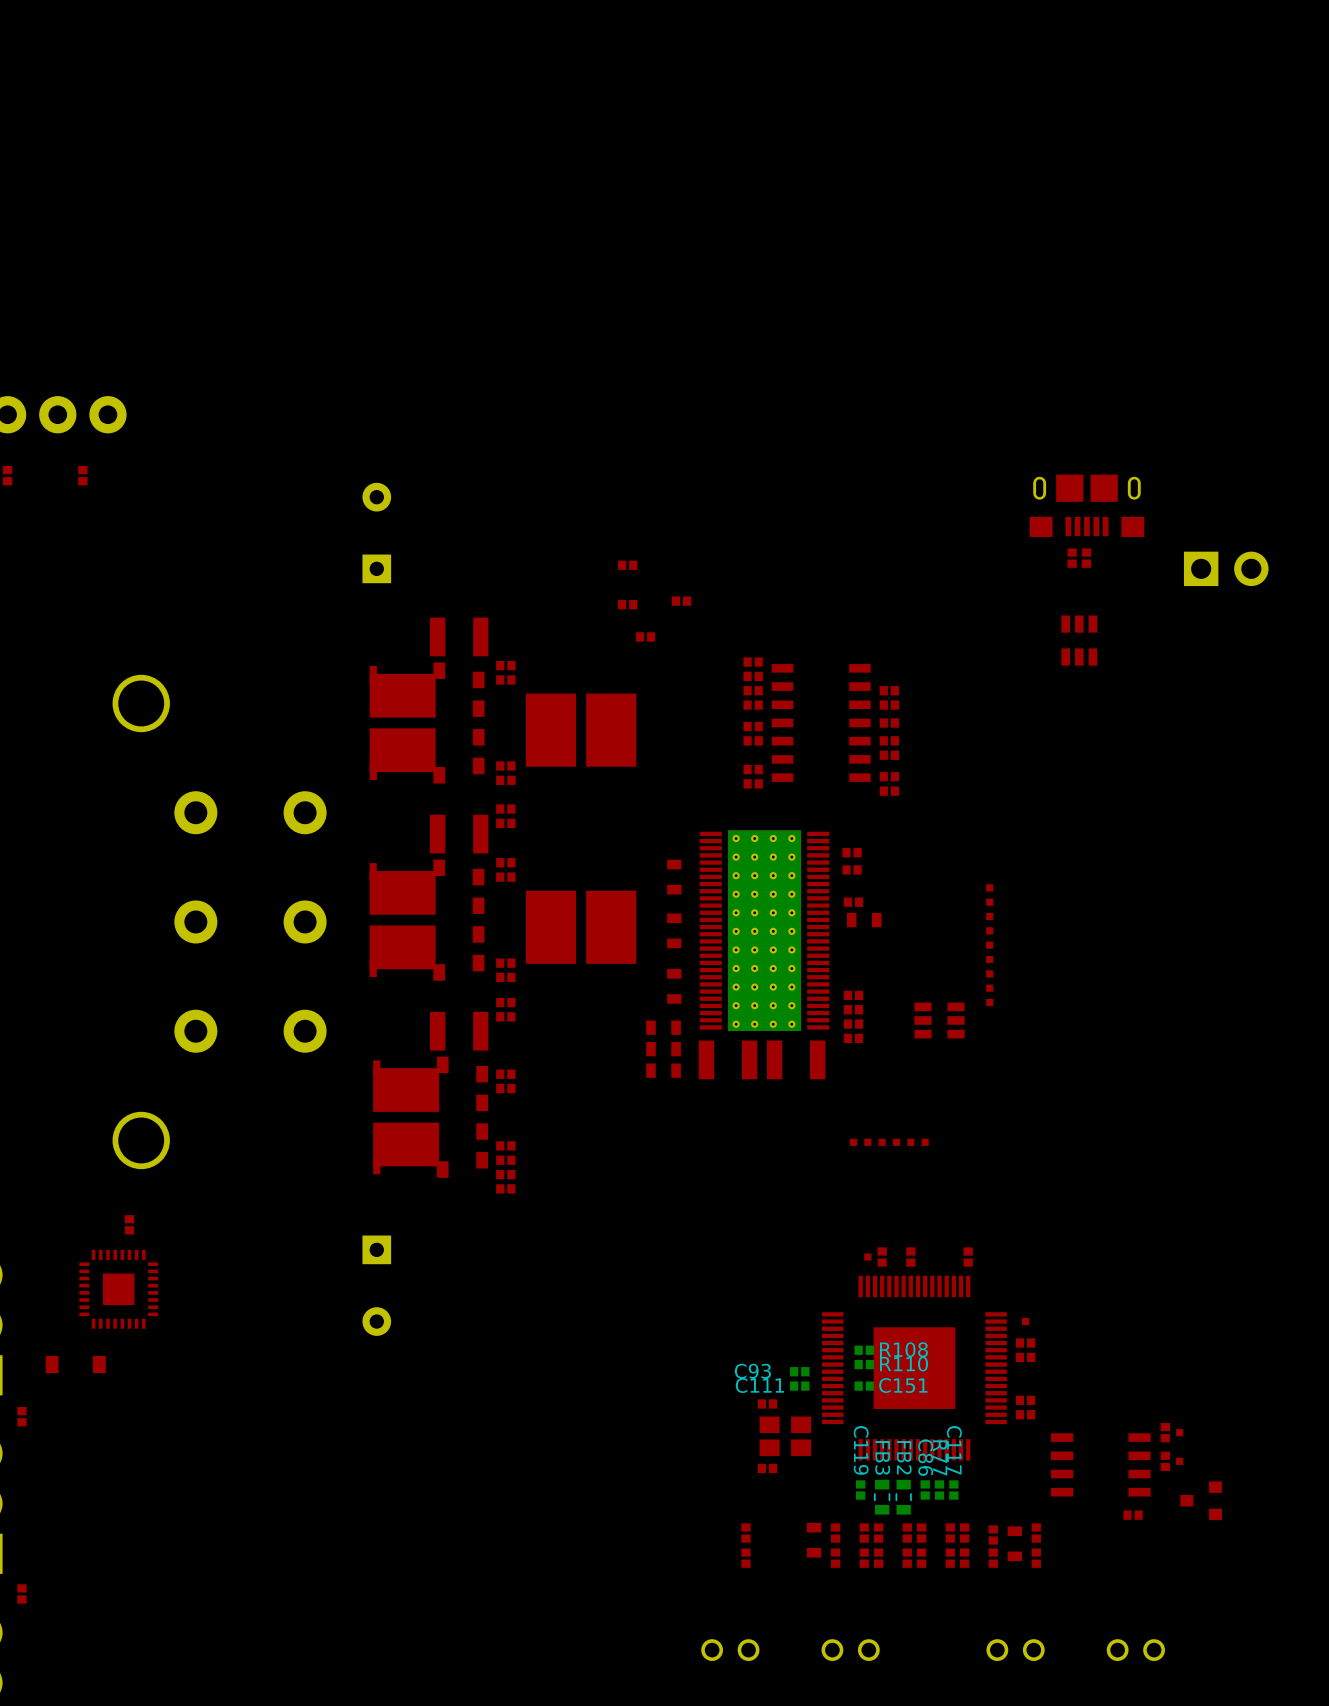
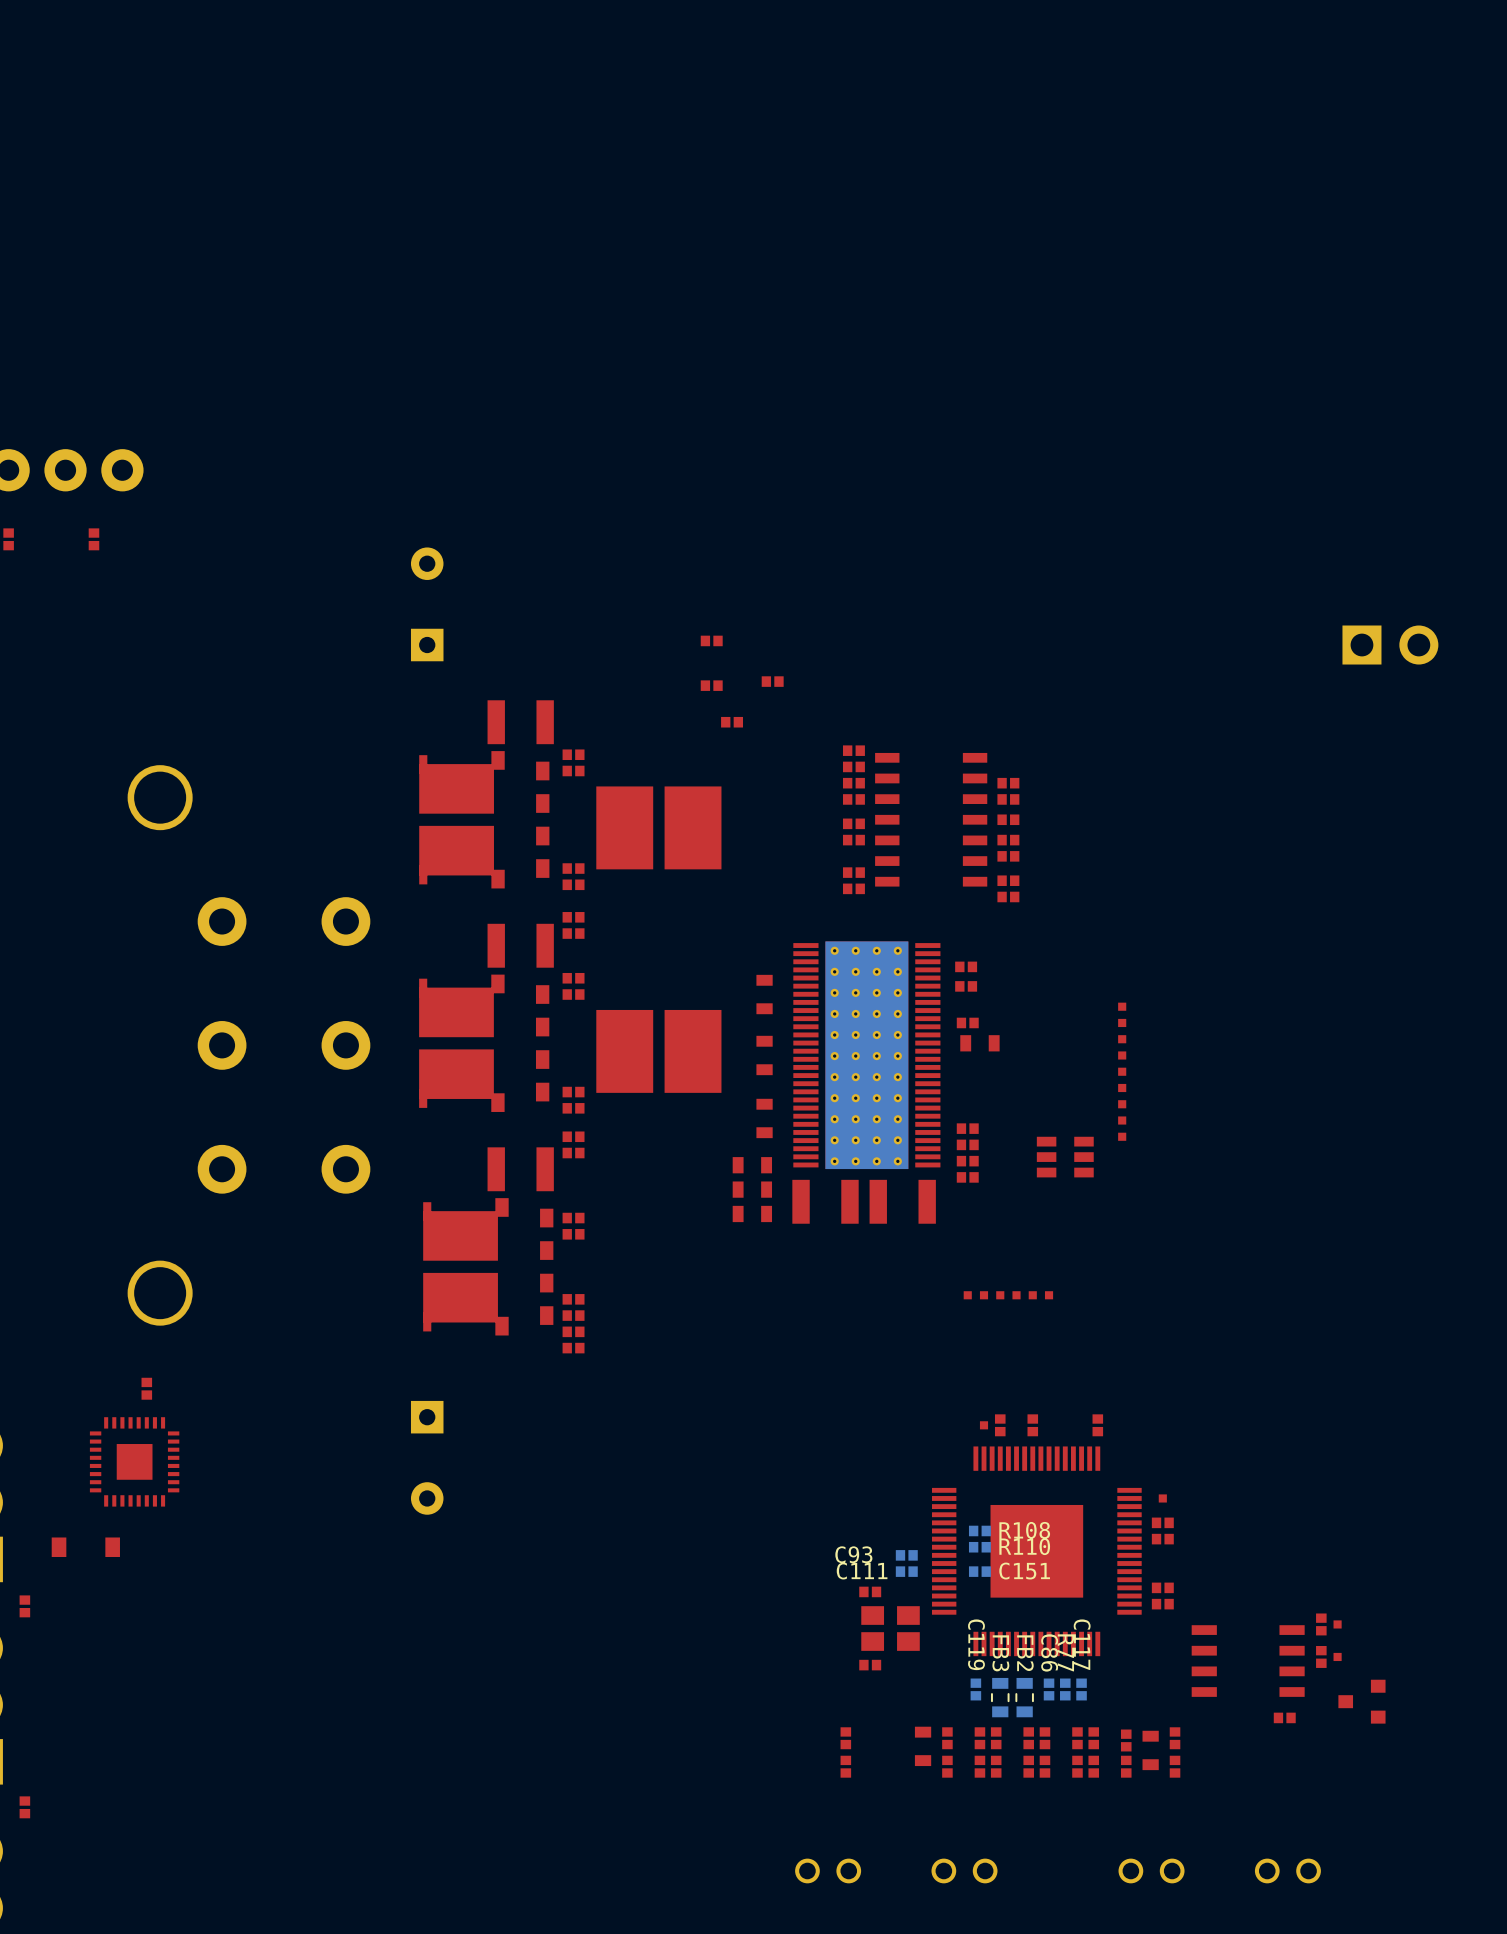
part: (1086, 505) -> none
part: (1072, 558) -> none
part: (1086, 558) -> none
part: (1079, 640) -> none

